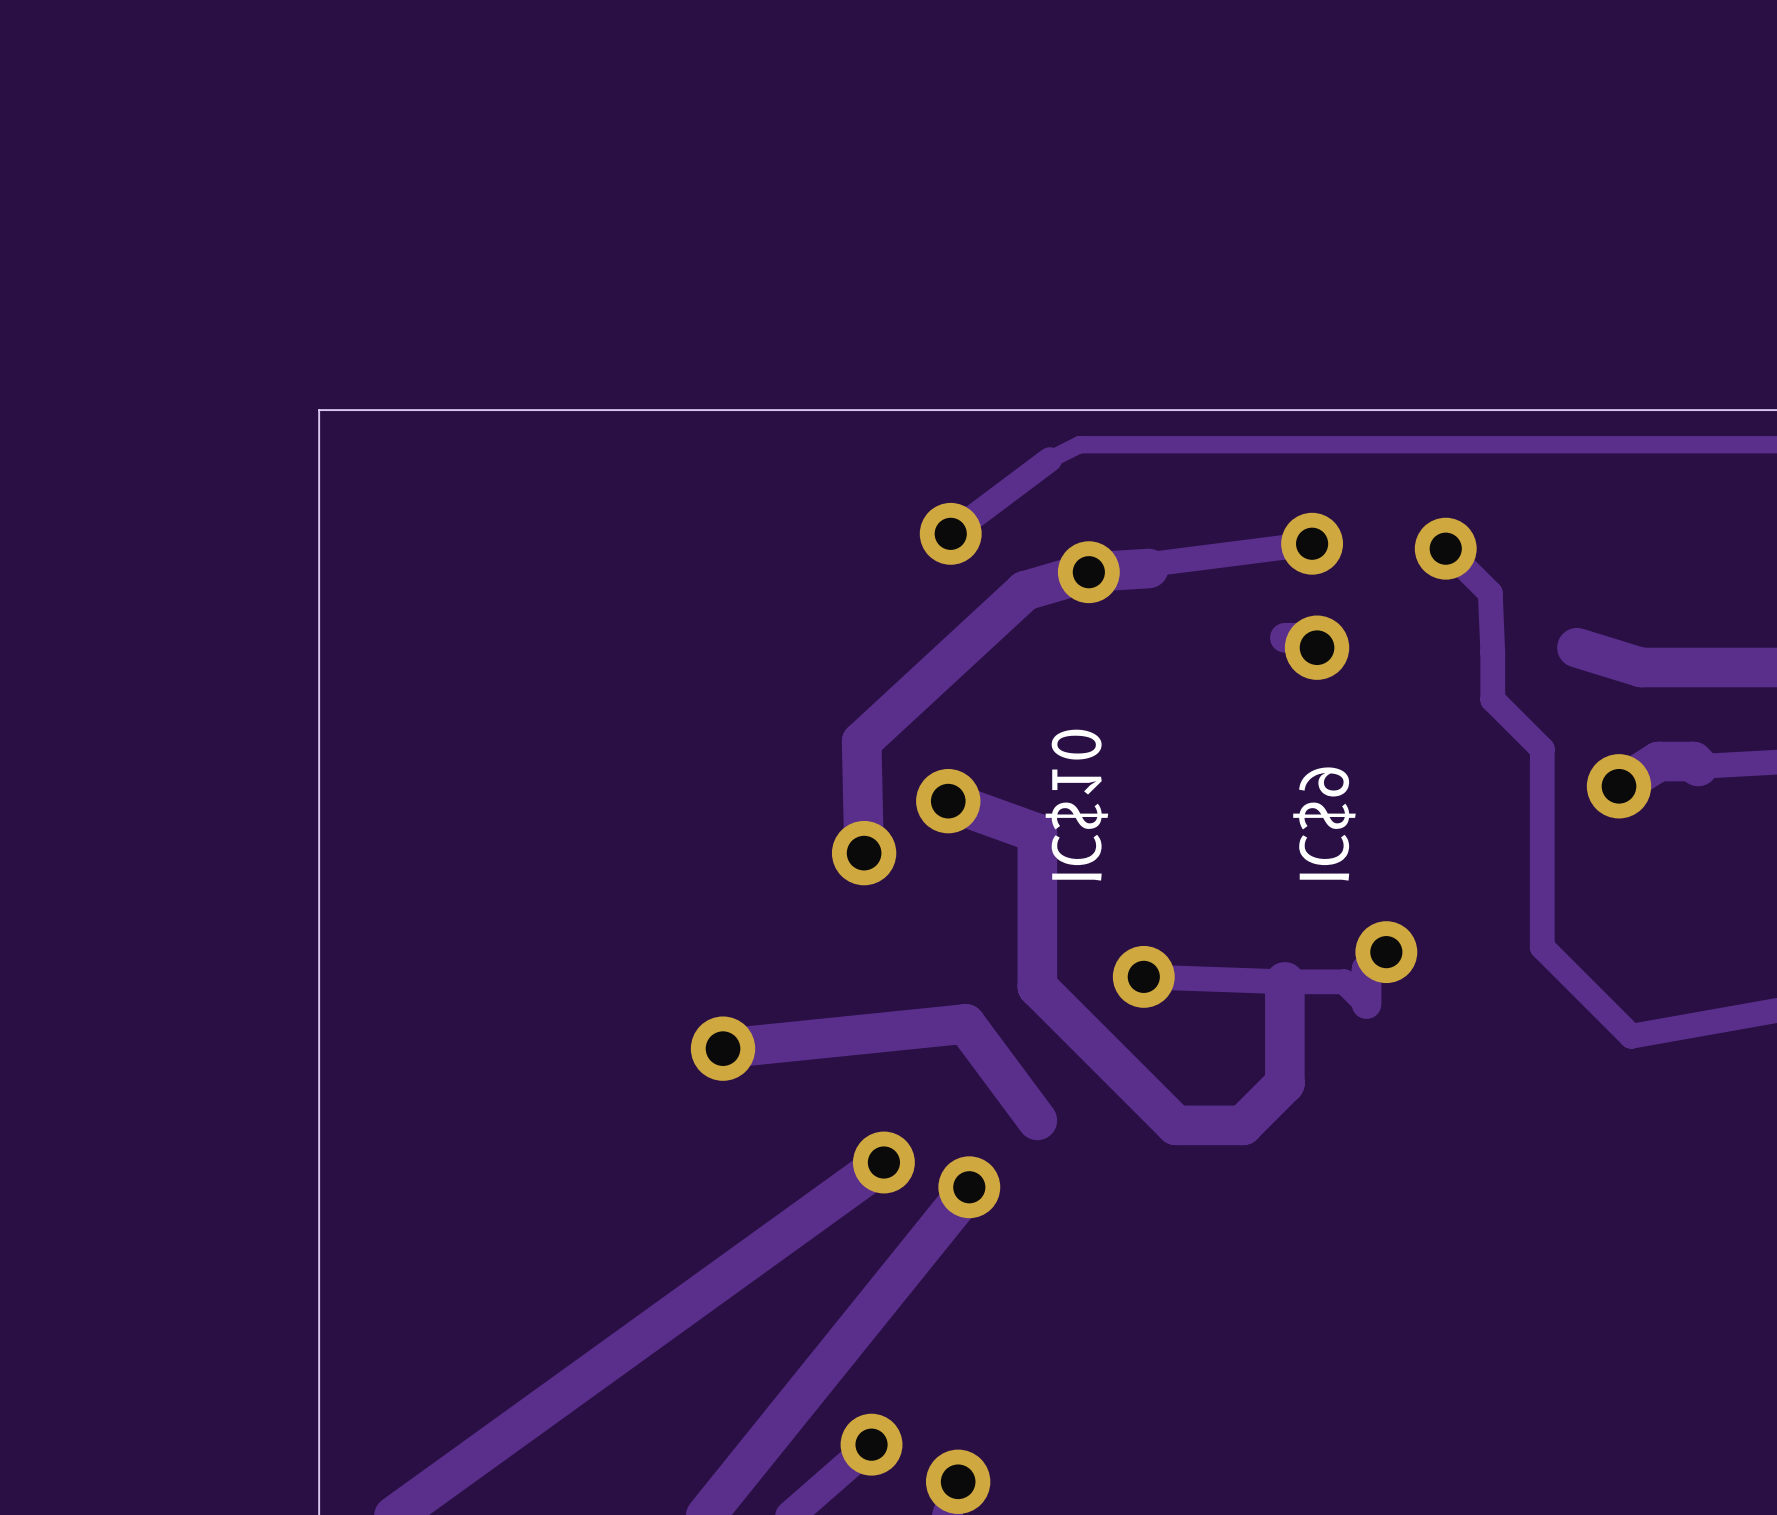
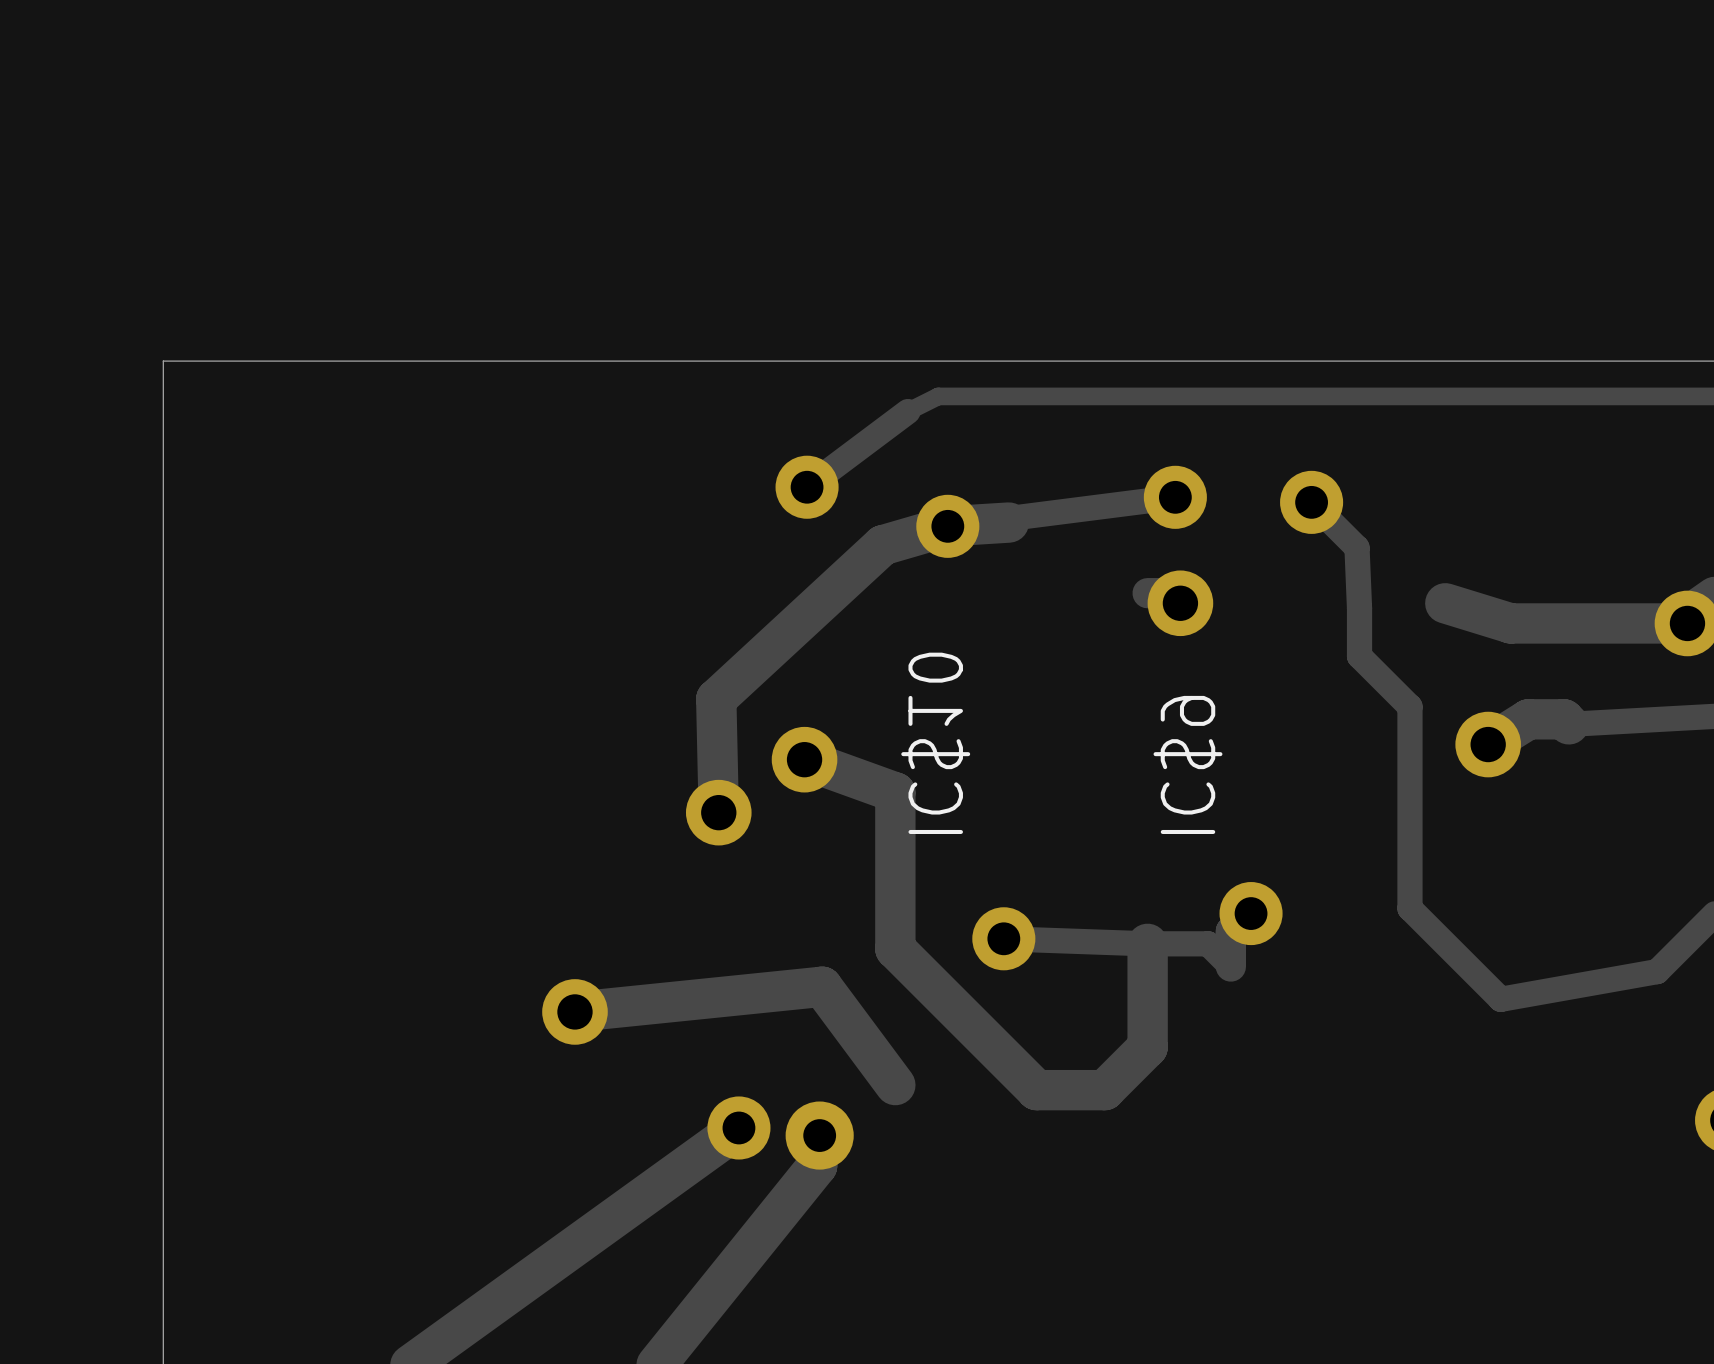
via position: (969, 1187) -> (819, 1135)

